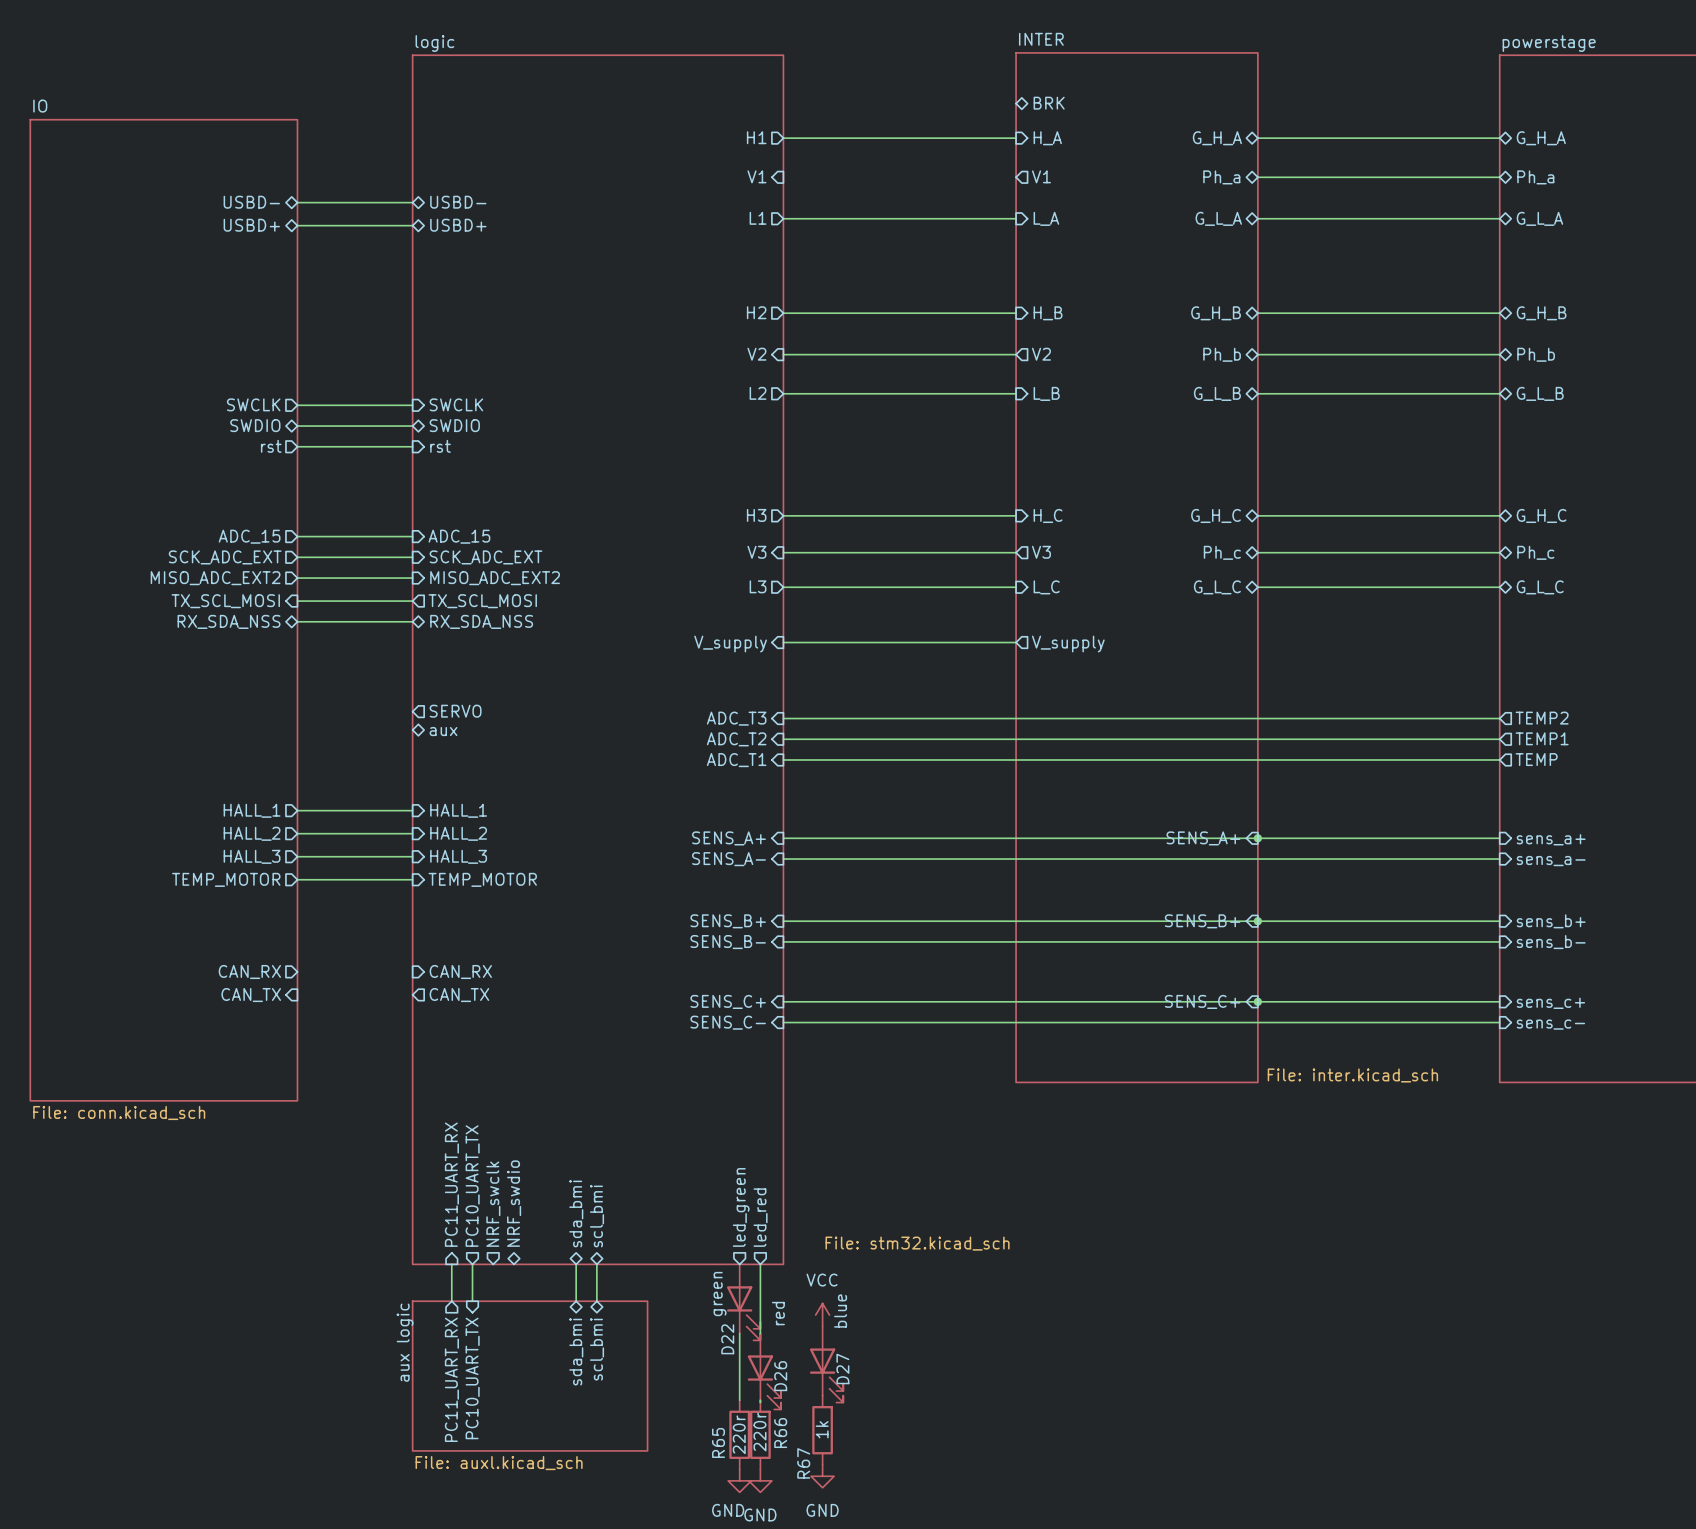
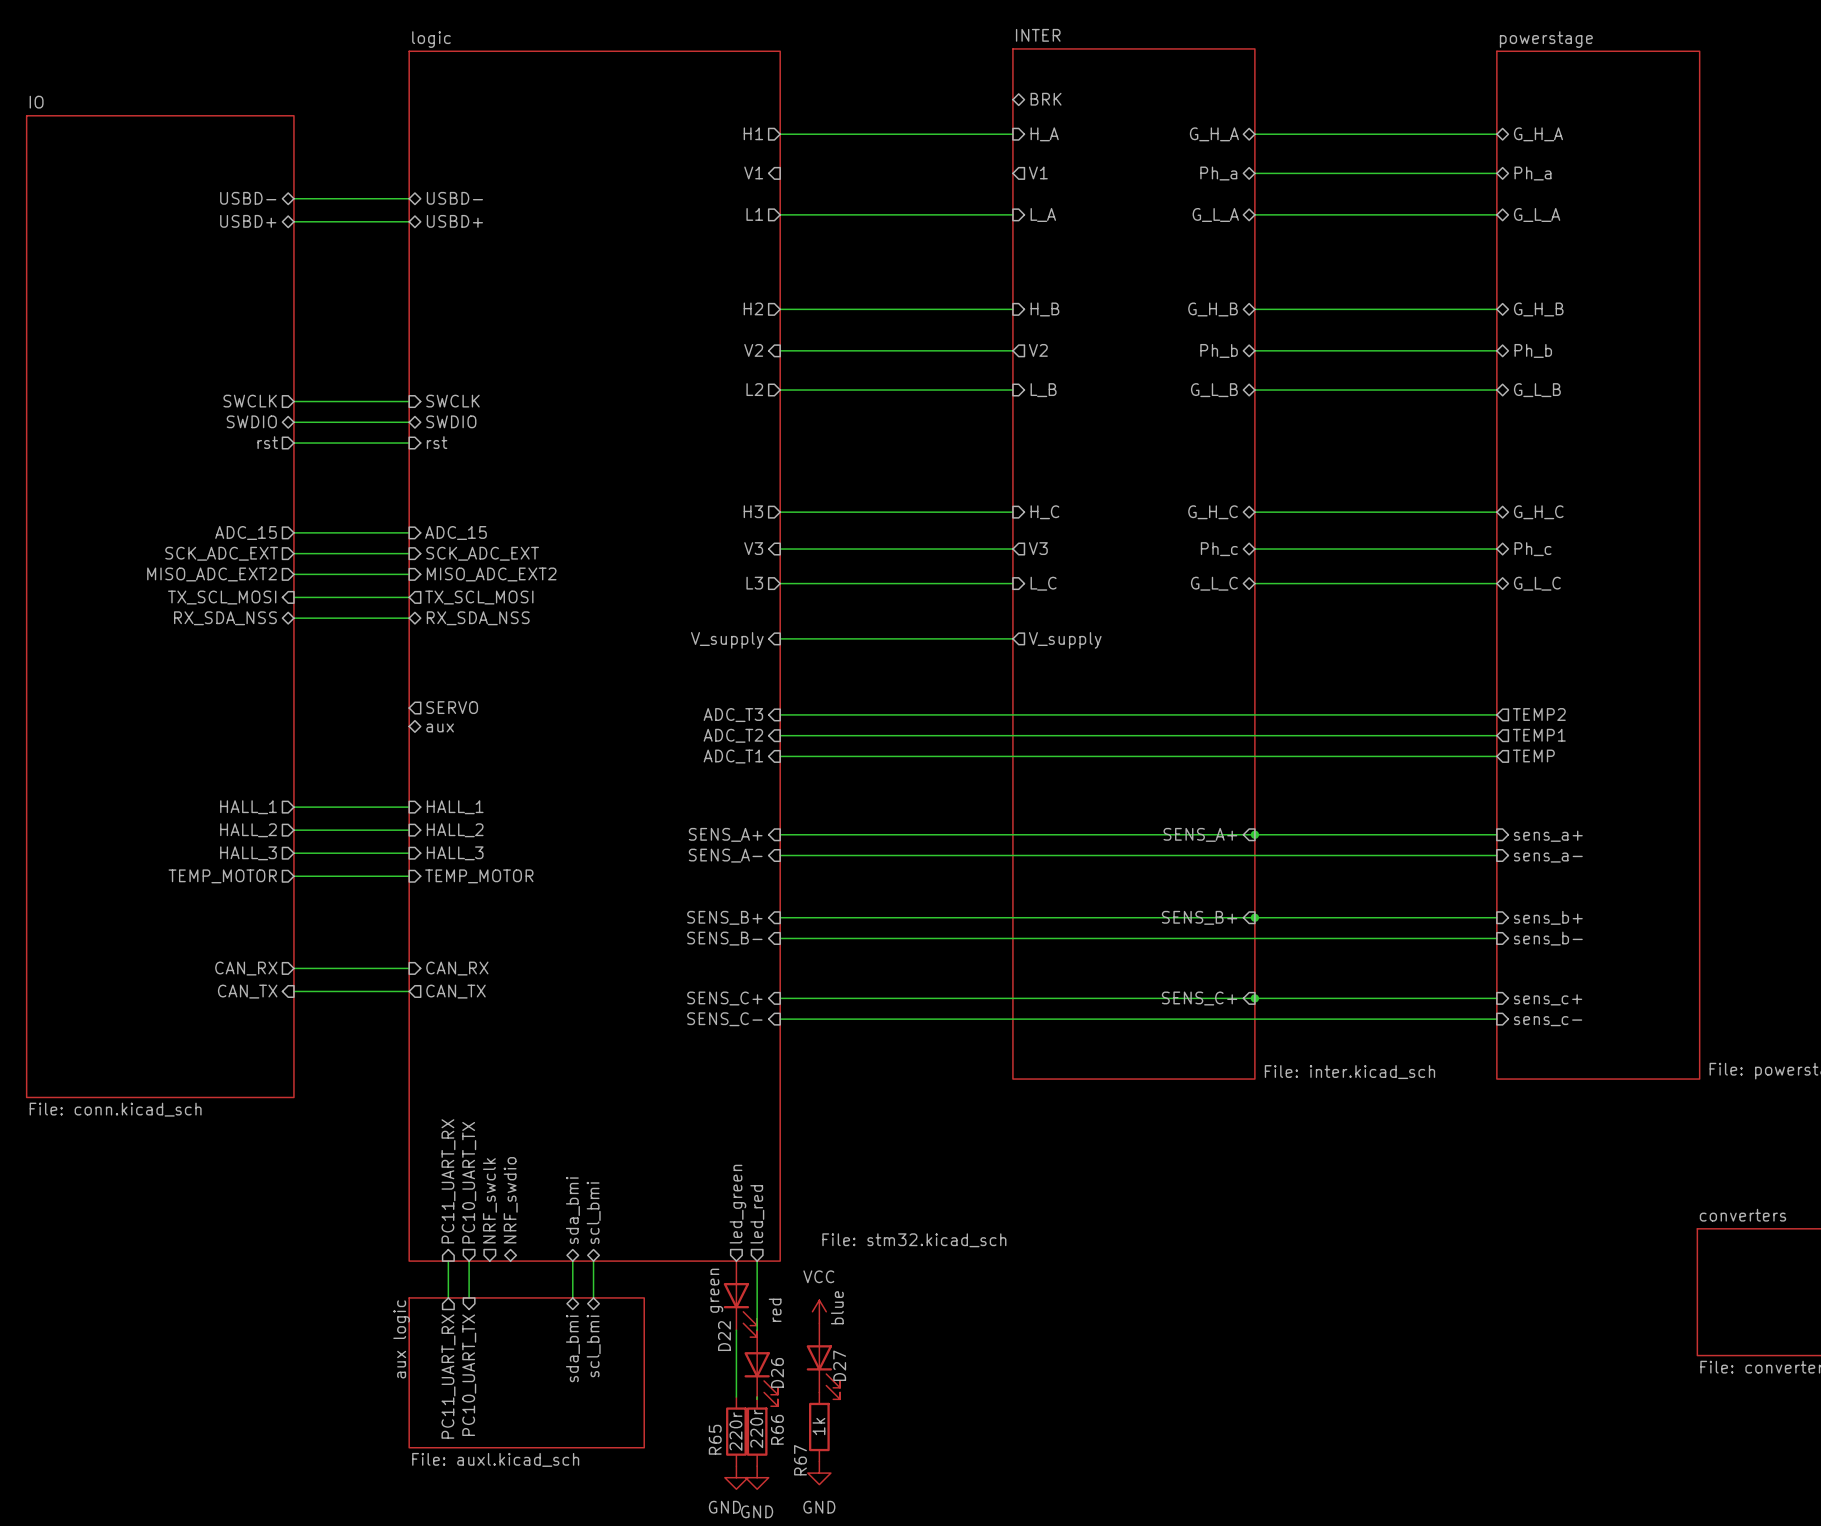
wire: none -> (293, 968) (409, 968)
wire: none -> (293, 991) (409, 991)

